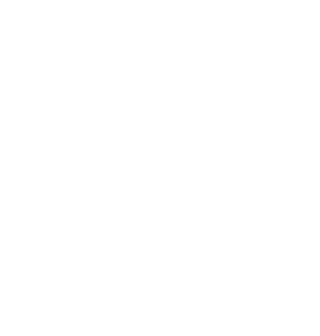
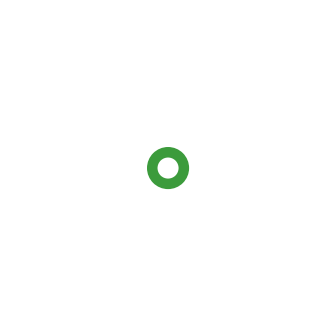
via: none -> (168, 168)

